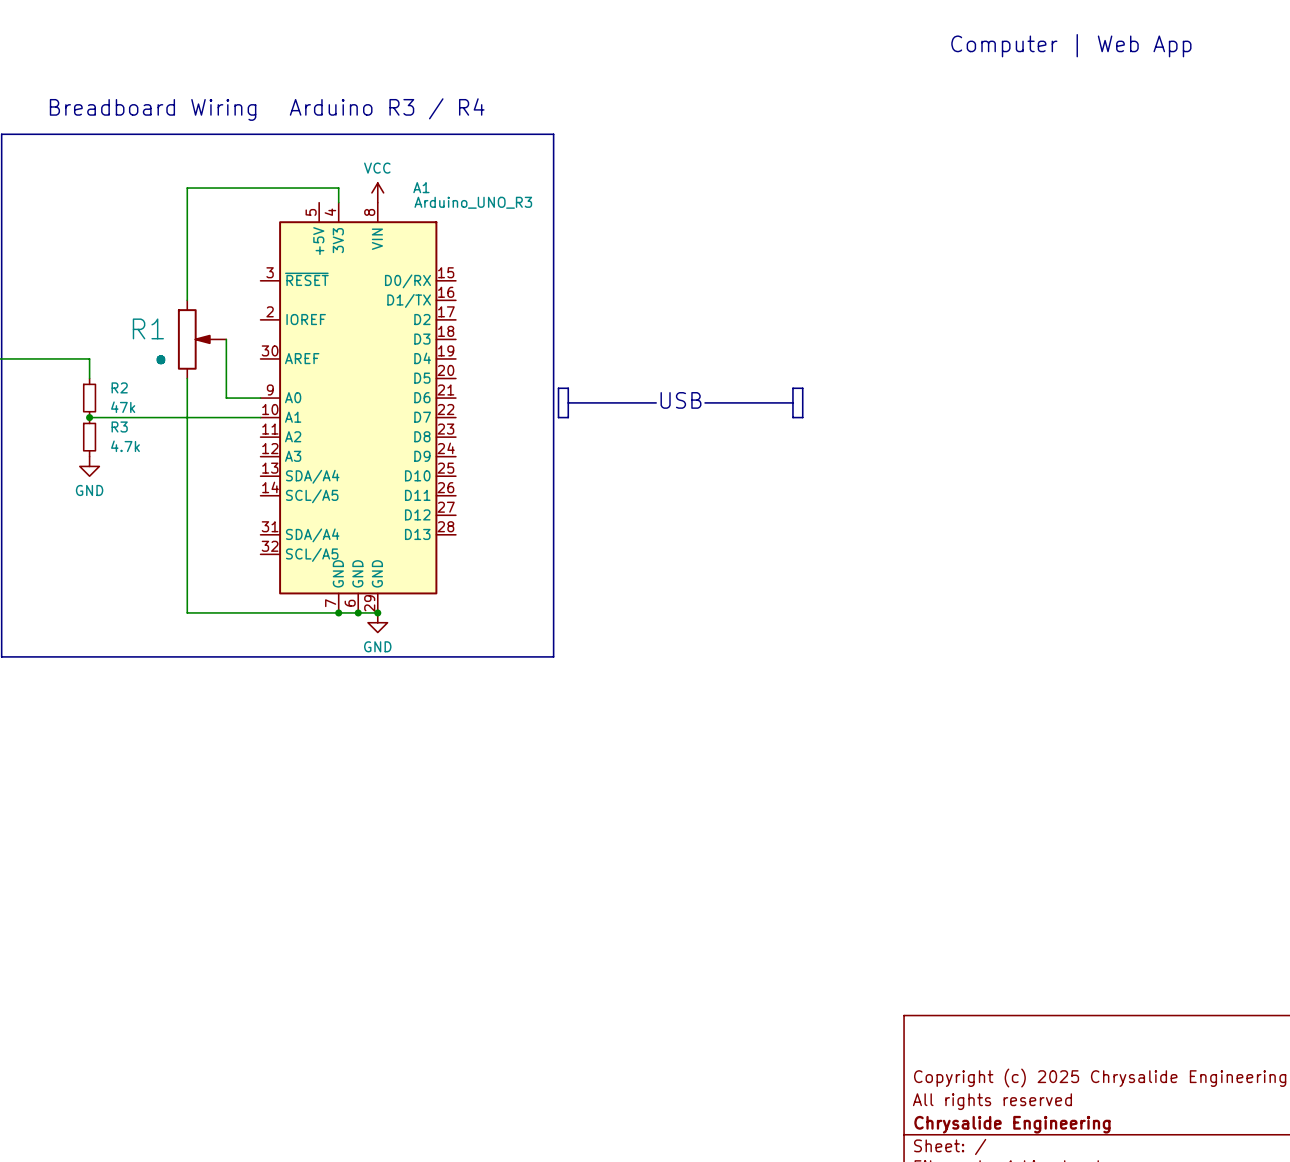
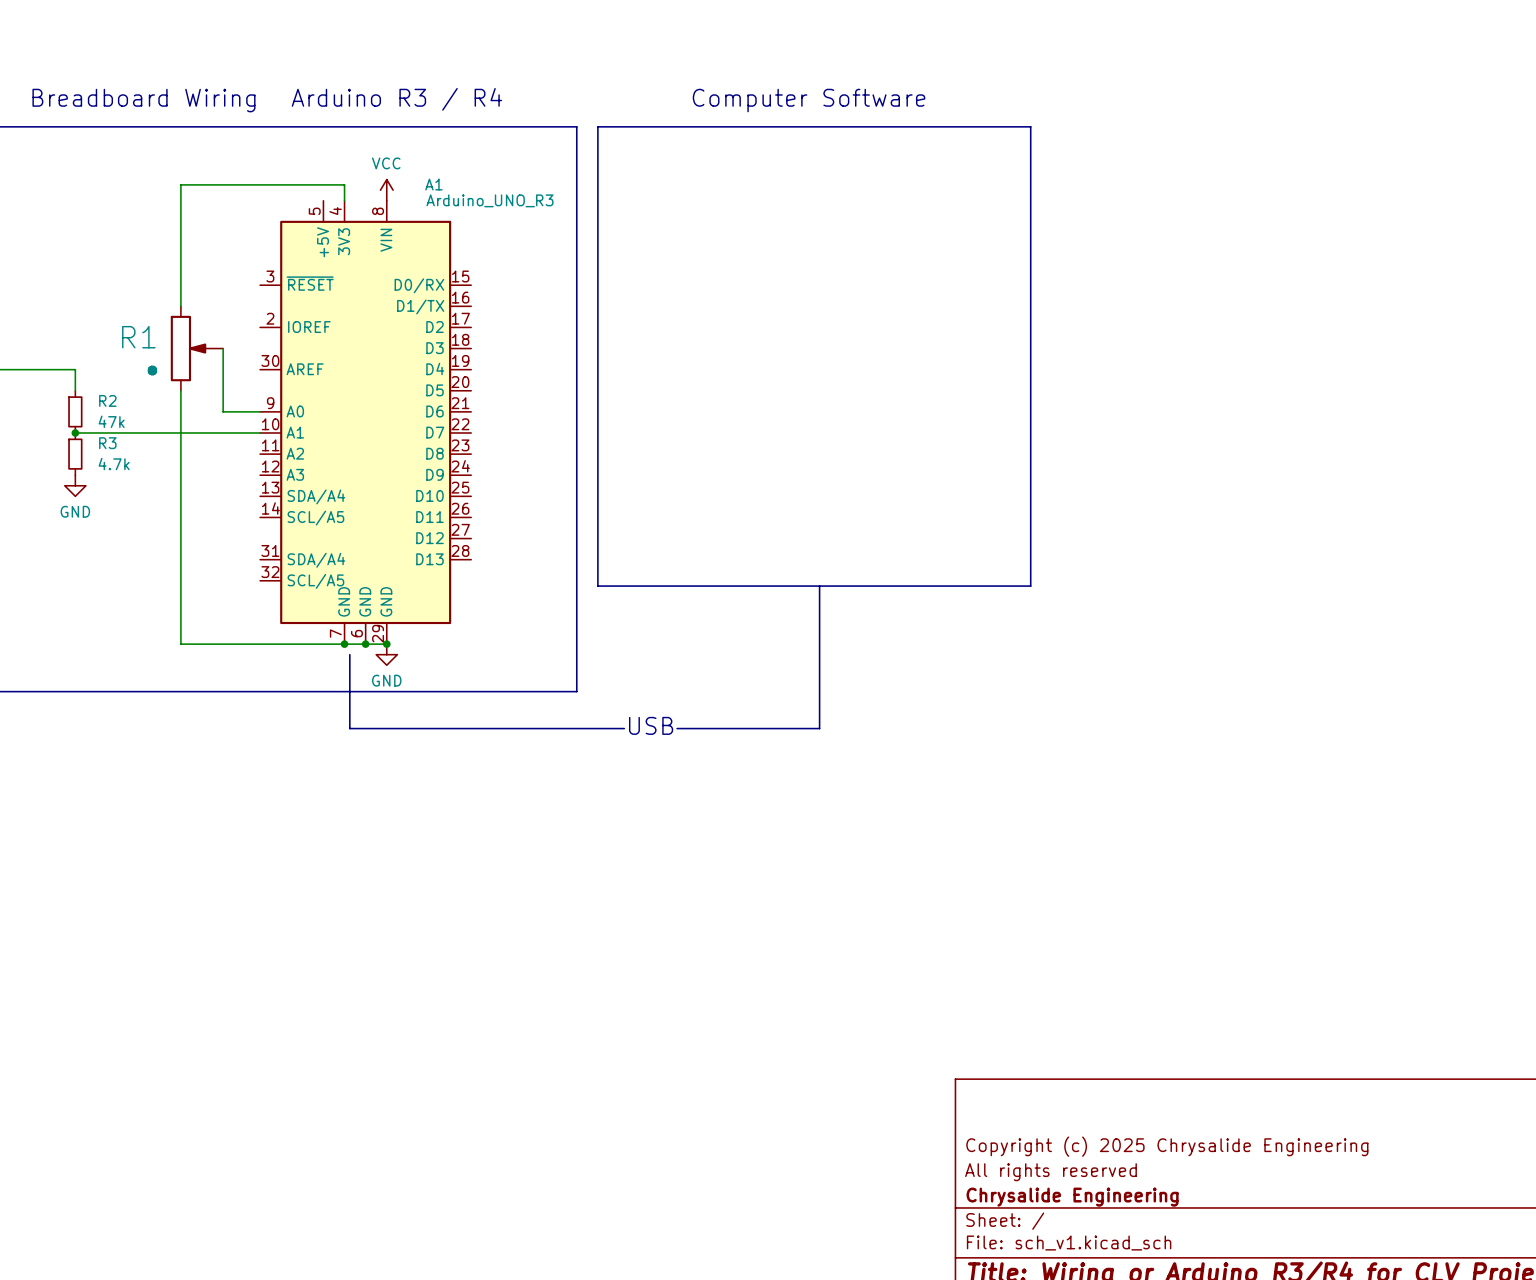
text: Computer | Web App (1071, 45) -> none
text: none -> Computer Software (809, 100)
line: none -> (597, 126) (1030, 126) (1030, 586) (597, 586) (597, 126)
line: (558, 388) (568, 388) (568, 417) (558, 417) (558, 388) -> none
line: (792, 388) (802, 388) (802, 417) (792, 417) (792, 388) -> none
text: USB (680, 400) -> none
line: (568, 402) (656, 402) -> none
line: (705, 402) (792, 402) -> none
line: none -> (819, 586) (819, 728) (677, 728)
line: none -> (349, 654) (349, 728) (624, 728)
text: none -> USB (651, 725)

